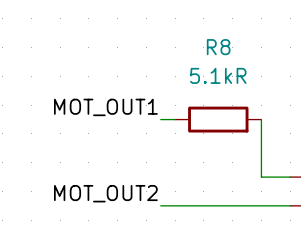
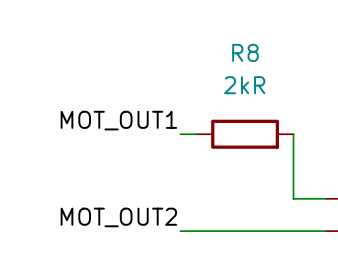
R8 value: 5.1kR (218, 75) -> 2kR (244, 85)

